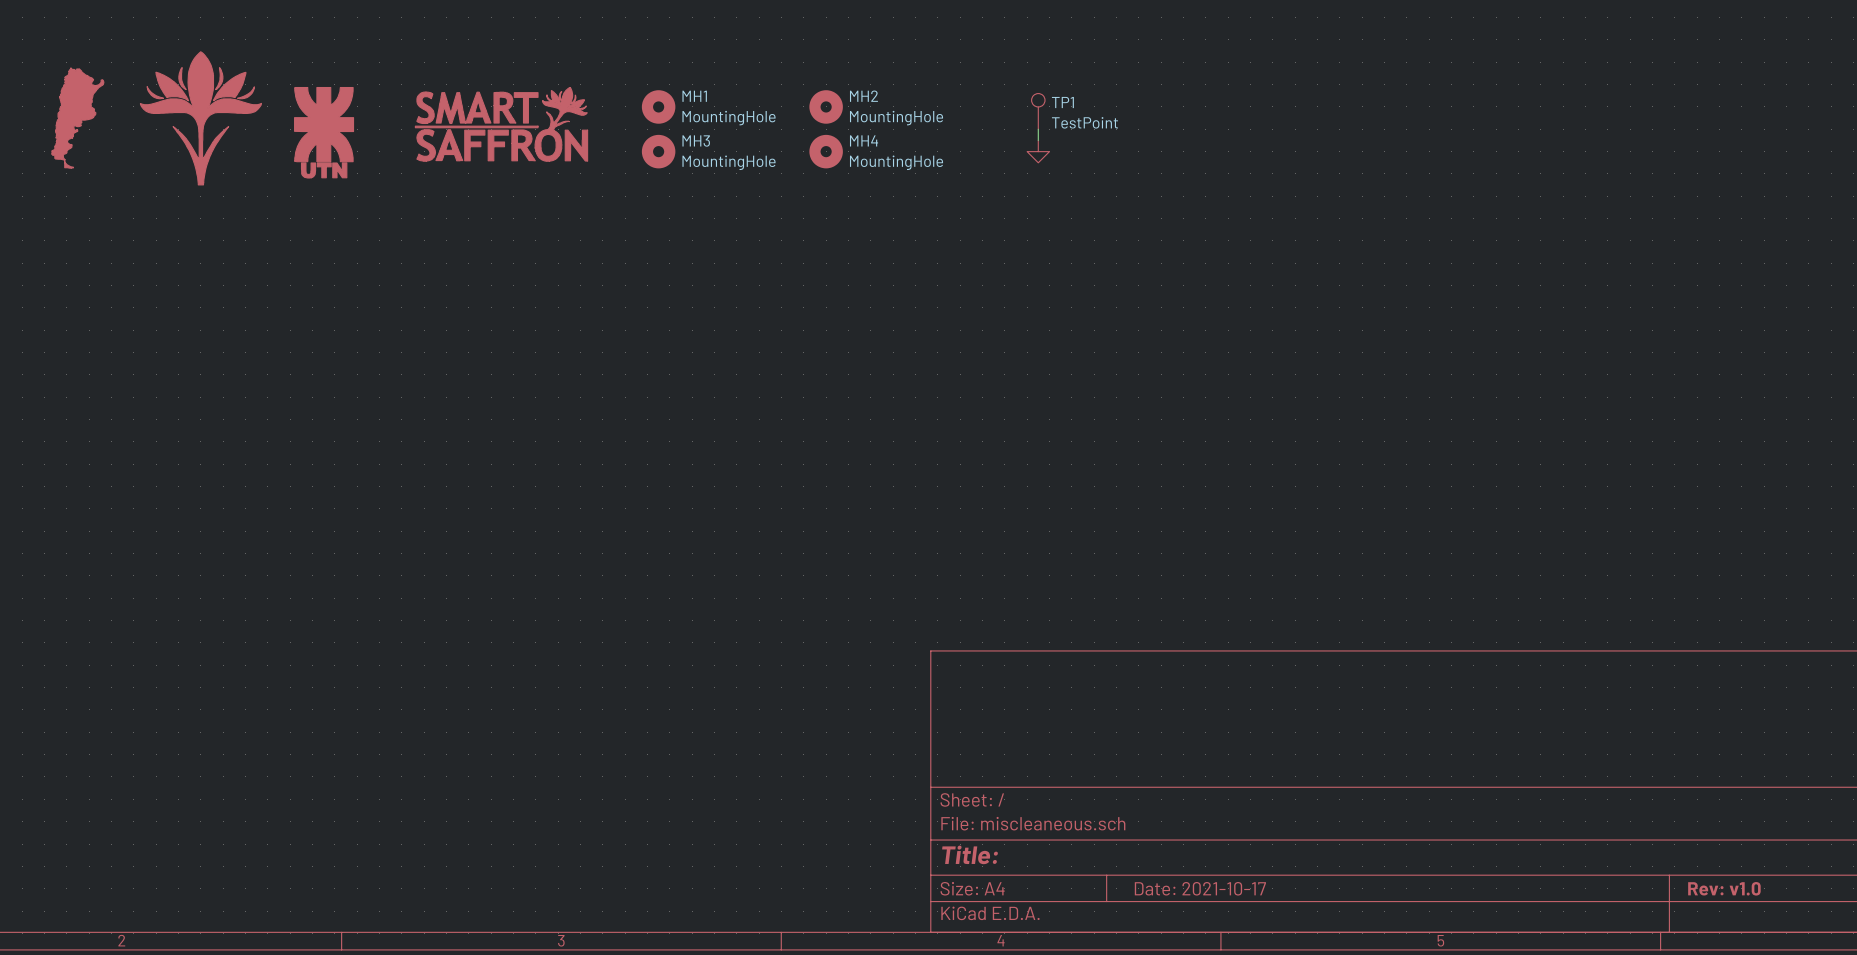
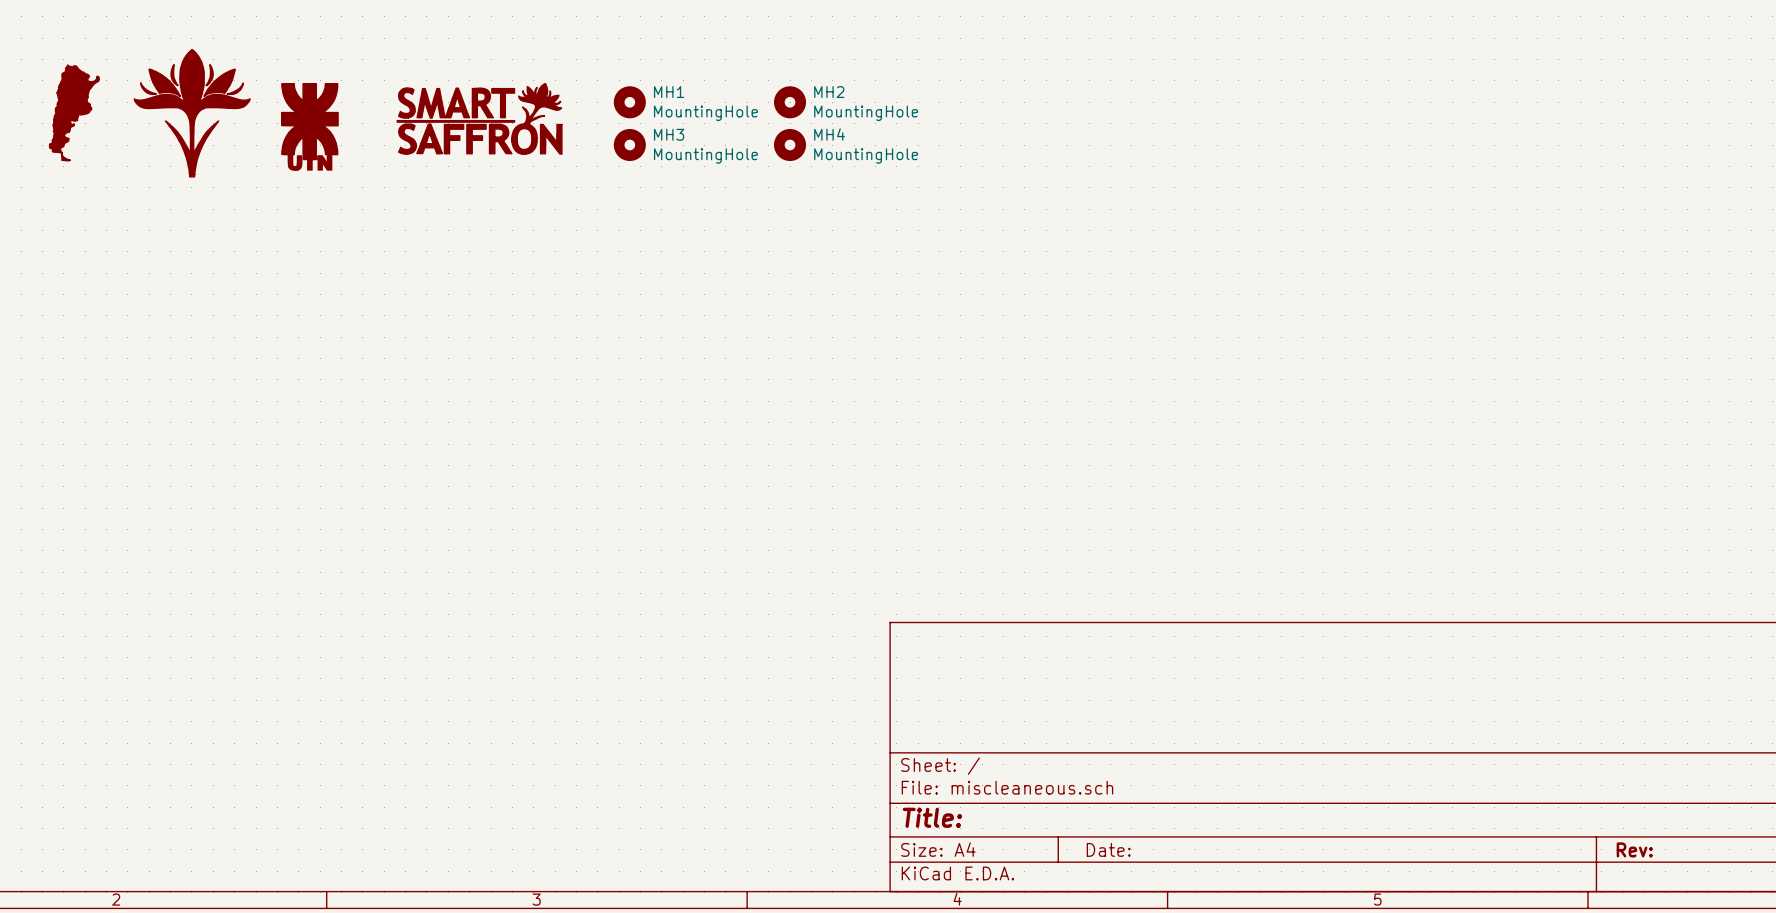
TP1: TestPoint (1038, 111) -> none
wire: (1038, 129) (1038, 140) -> none
power symbol: (1038, 151) -> none
title block: Date: 2021-10-17 (1200, 888) -> Date: (1108, 849)
title block: Rev: v1.0 (1724, 888) -> Rev: (1634, 849)

